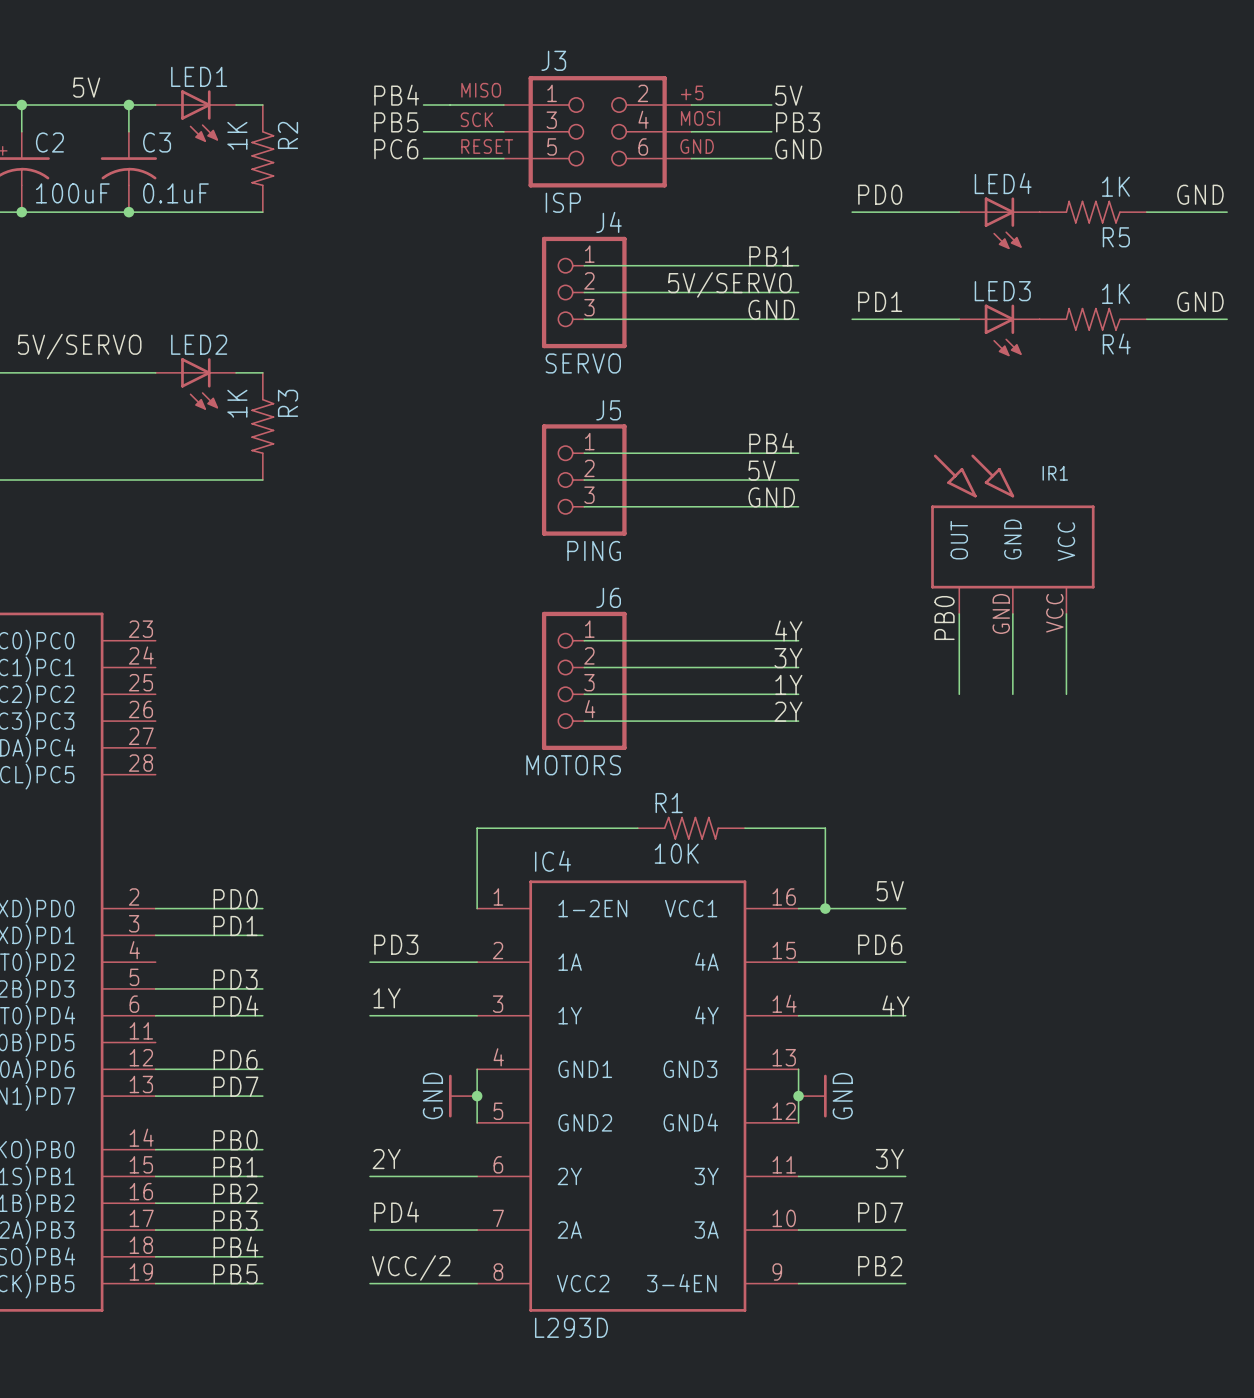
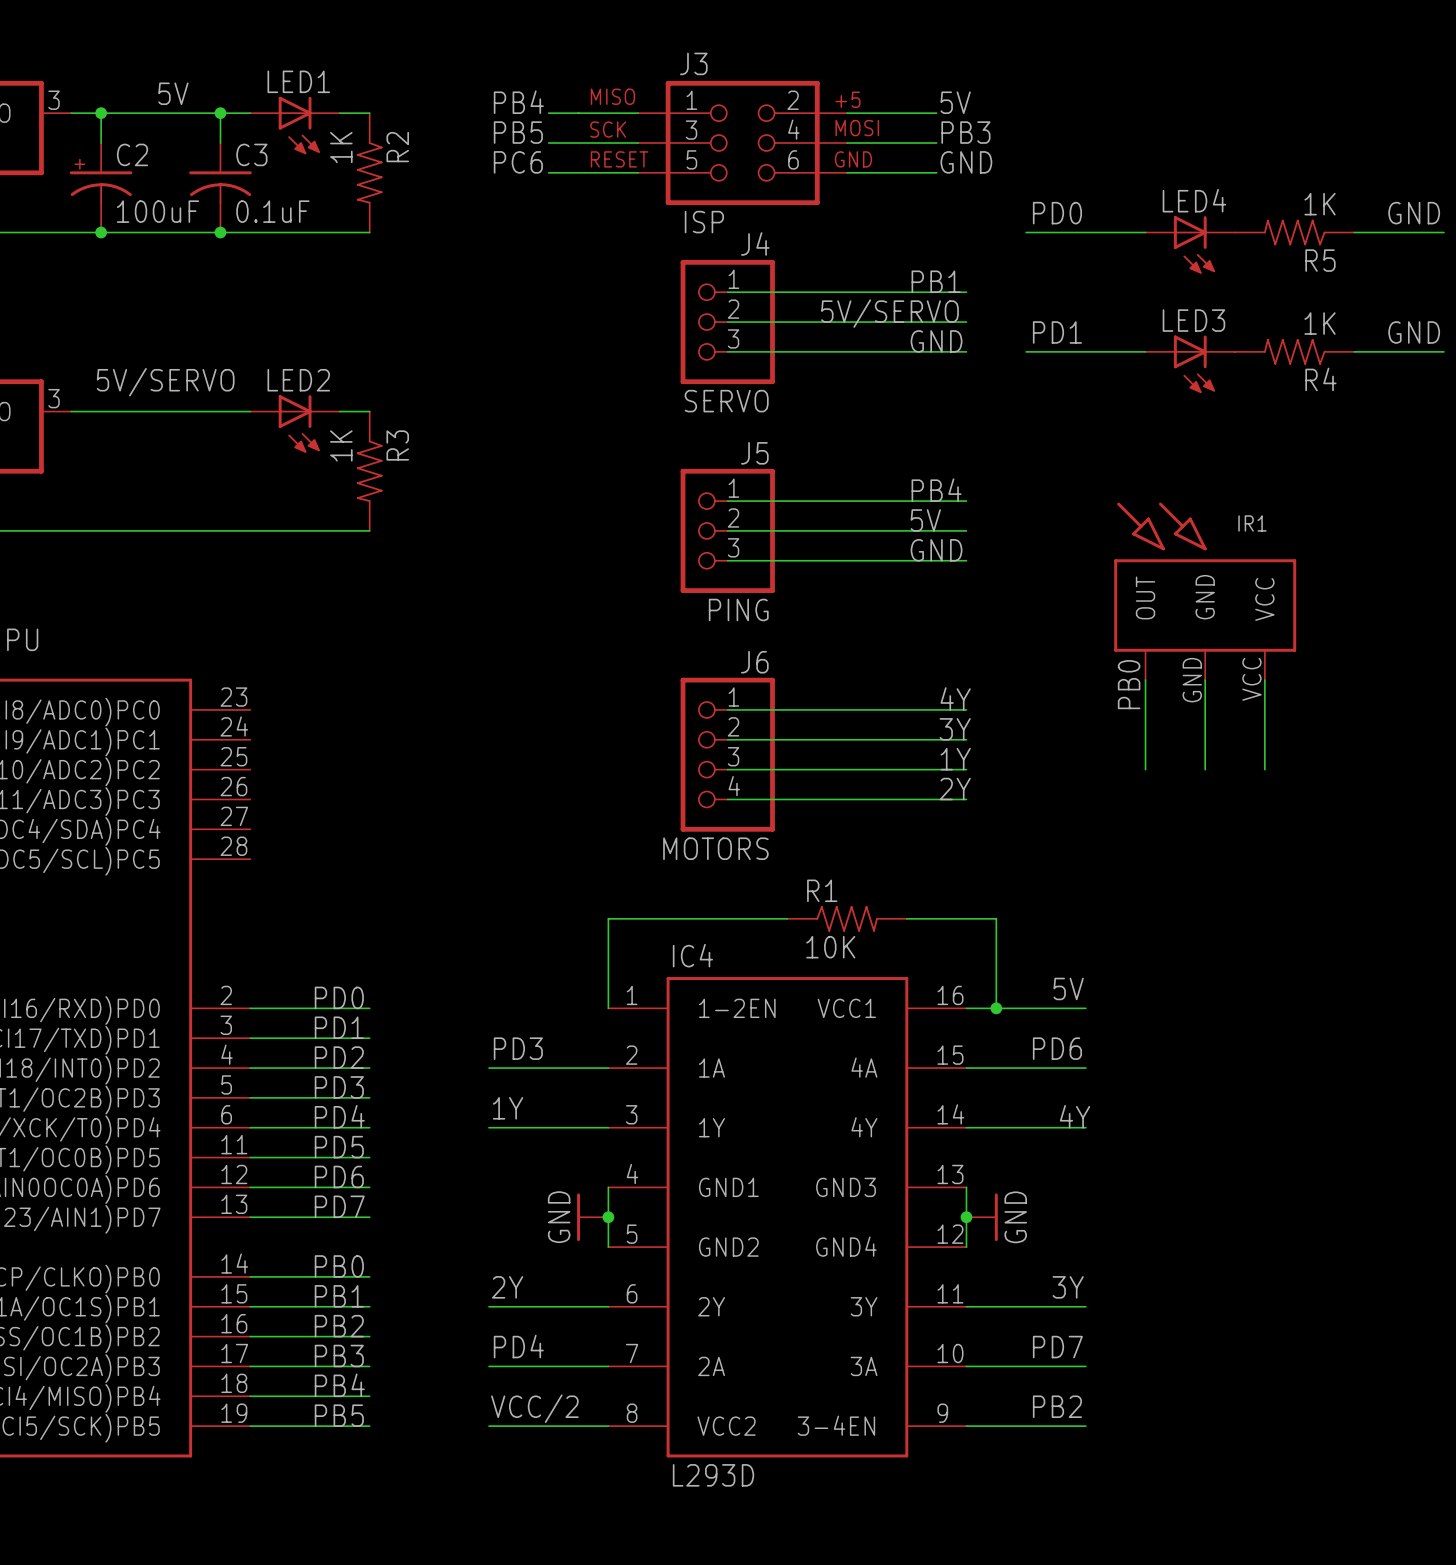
label: none -> PD2 (339, 1057)
wire: none -> (250, 1068) (369, 1068)
label: none -> PD5 (339, 1147)
wire: none -> (250, 1157) (369, 1157)

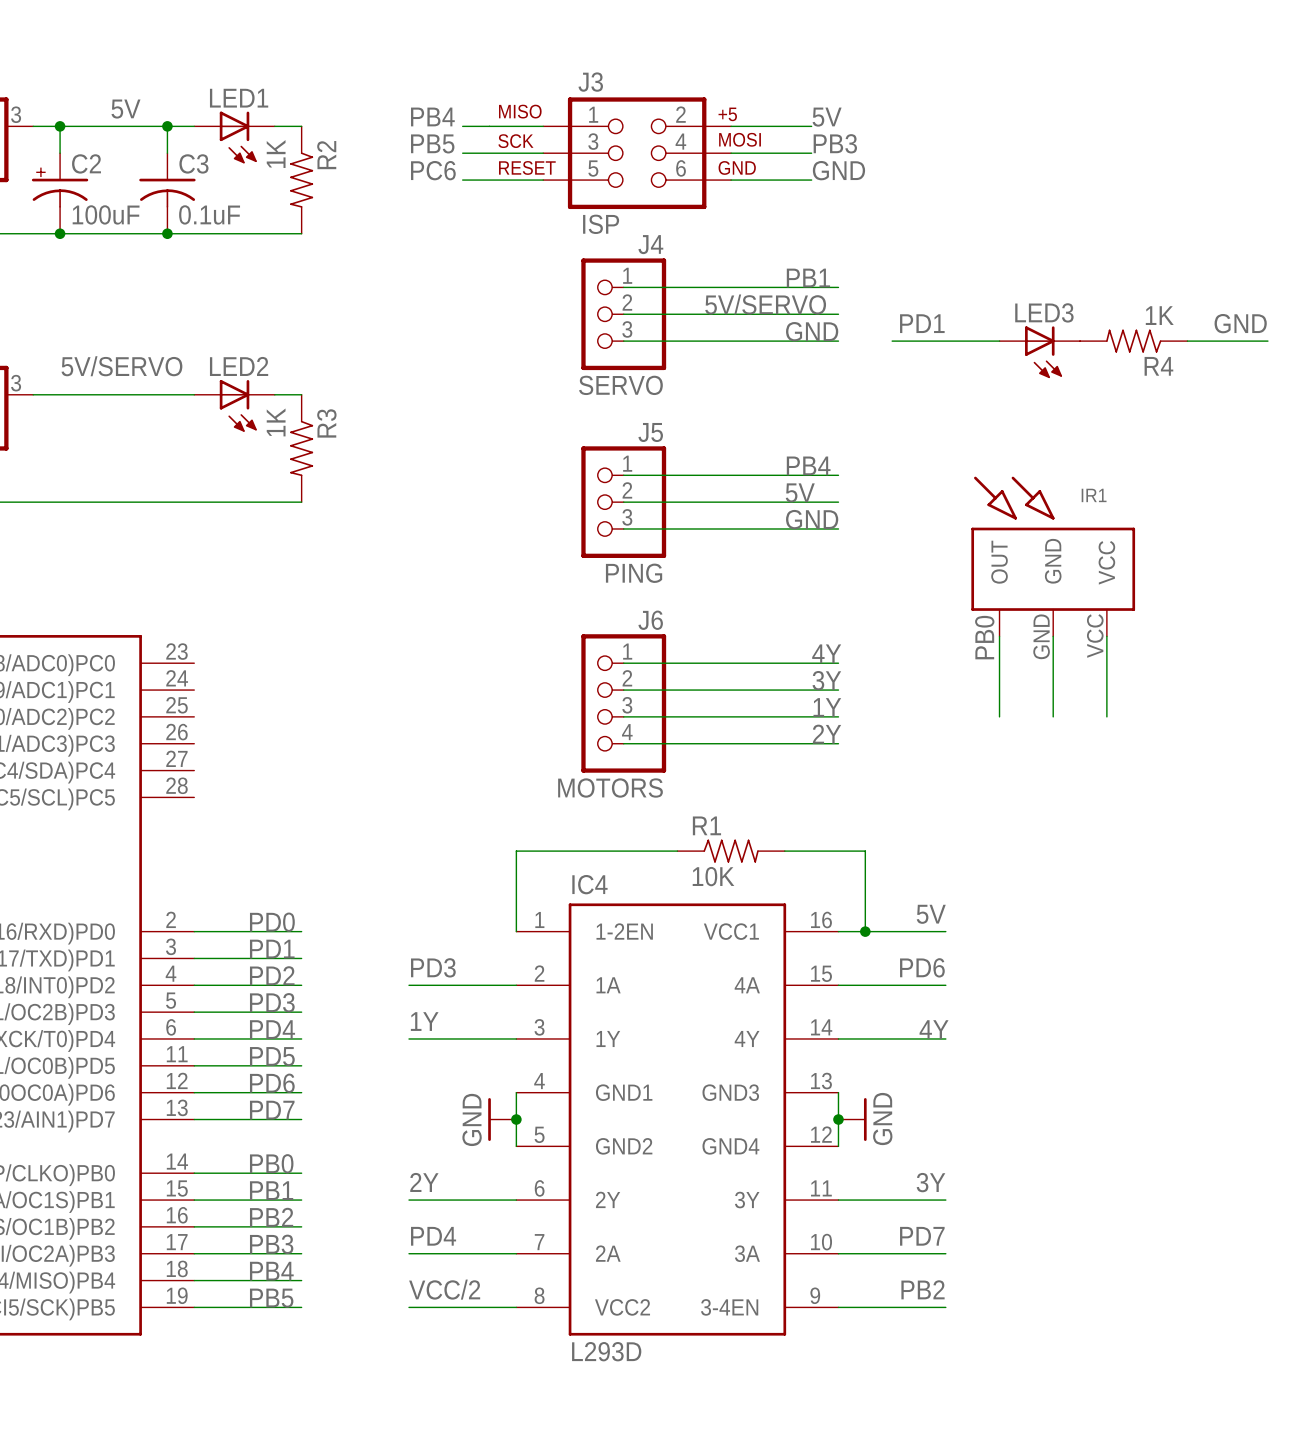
label: PD0 (1057, 213) -> none
label: GND (1414, 213) -> none
wire: (1026, 232) (1145, 232) -> none
R5: 1K (1294, 232) -> none
wire: (1354, 232) (1443, 232) -> none
LED4: (1190, 244) -> none

